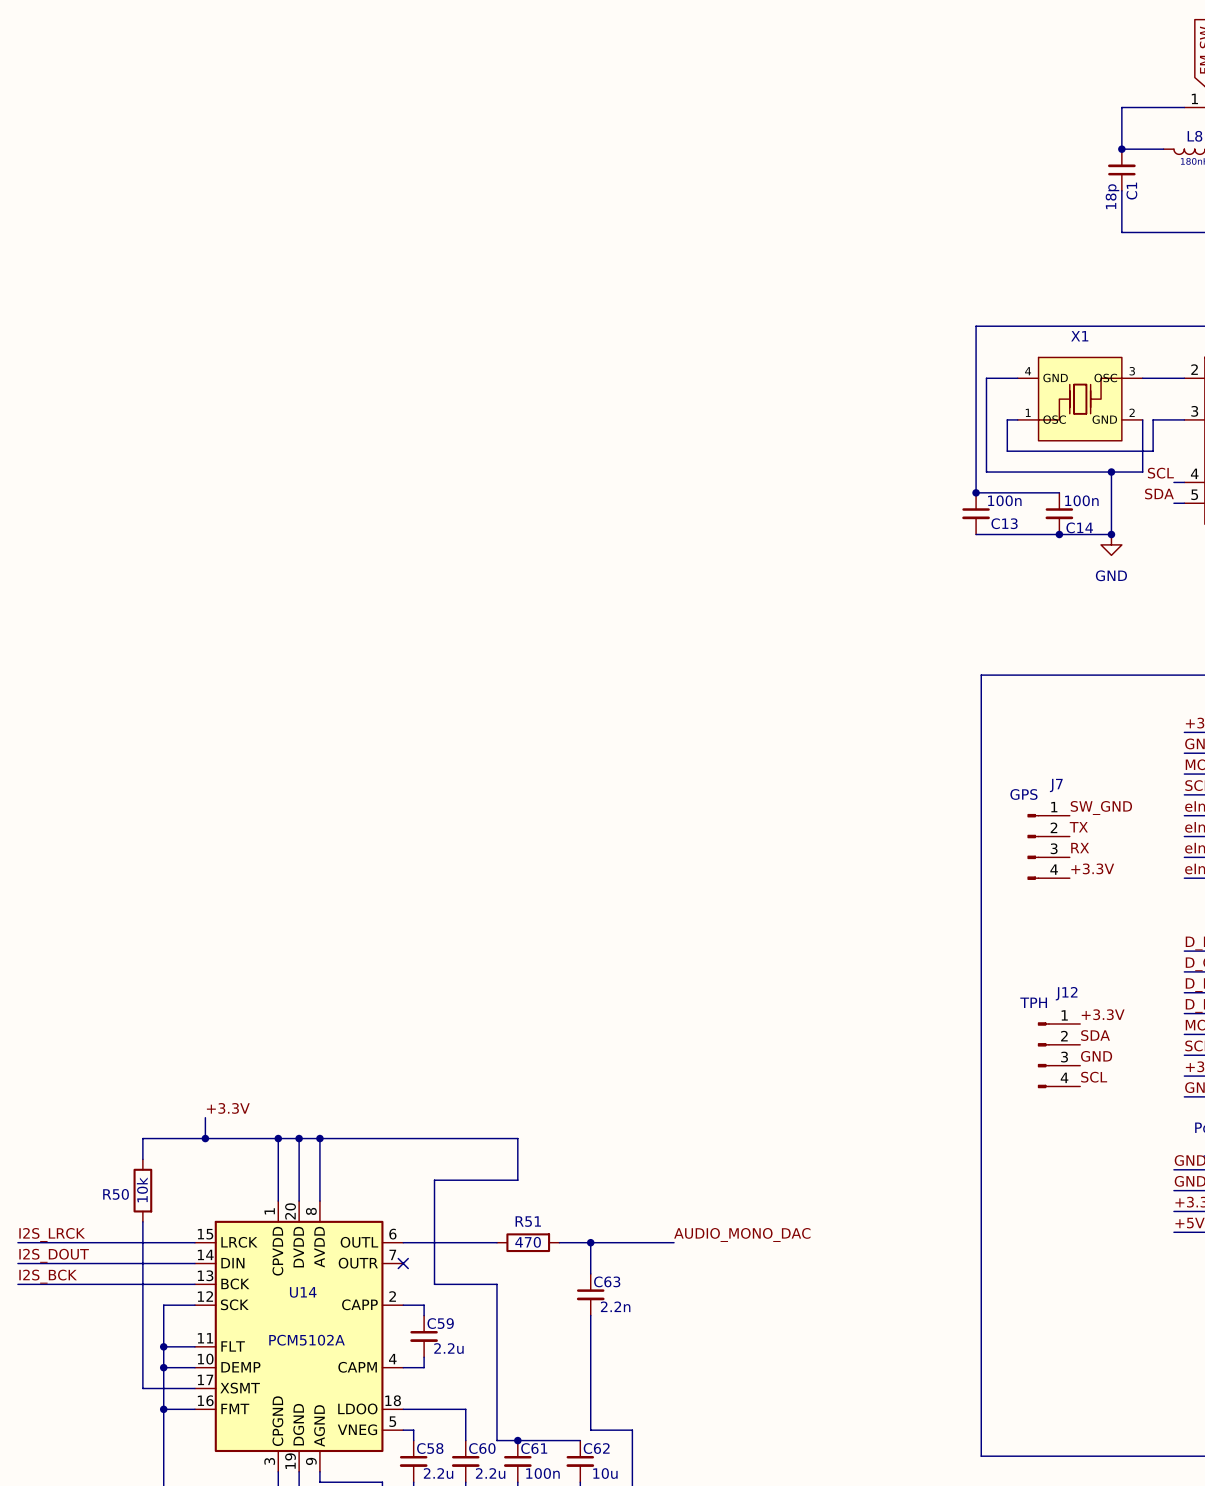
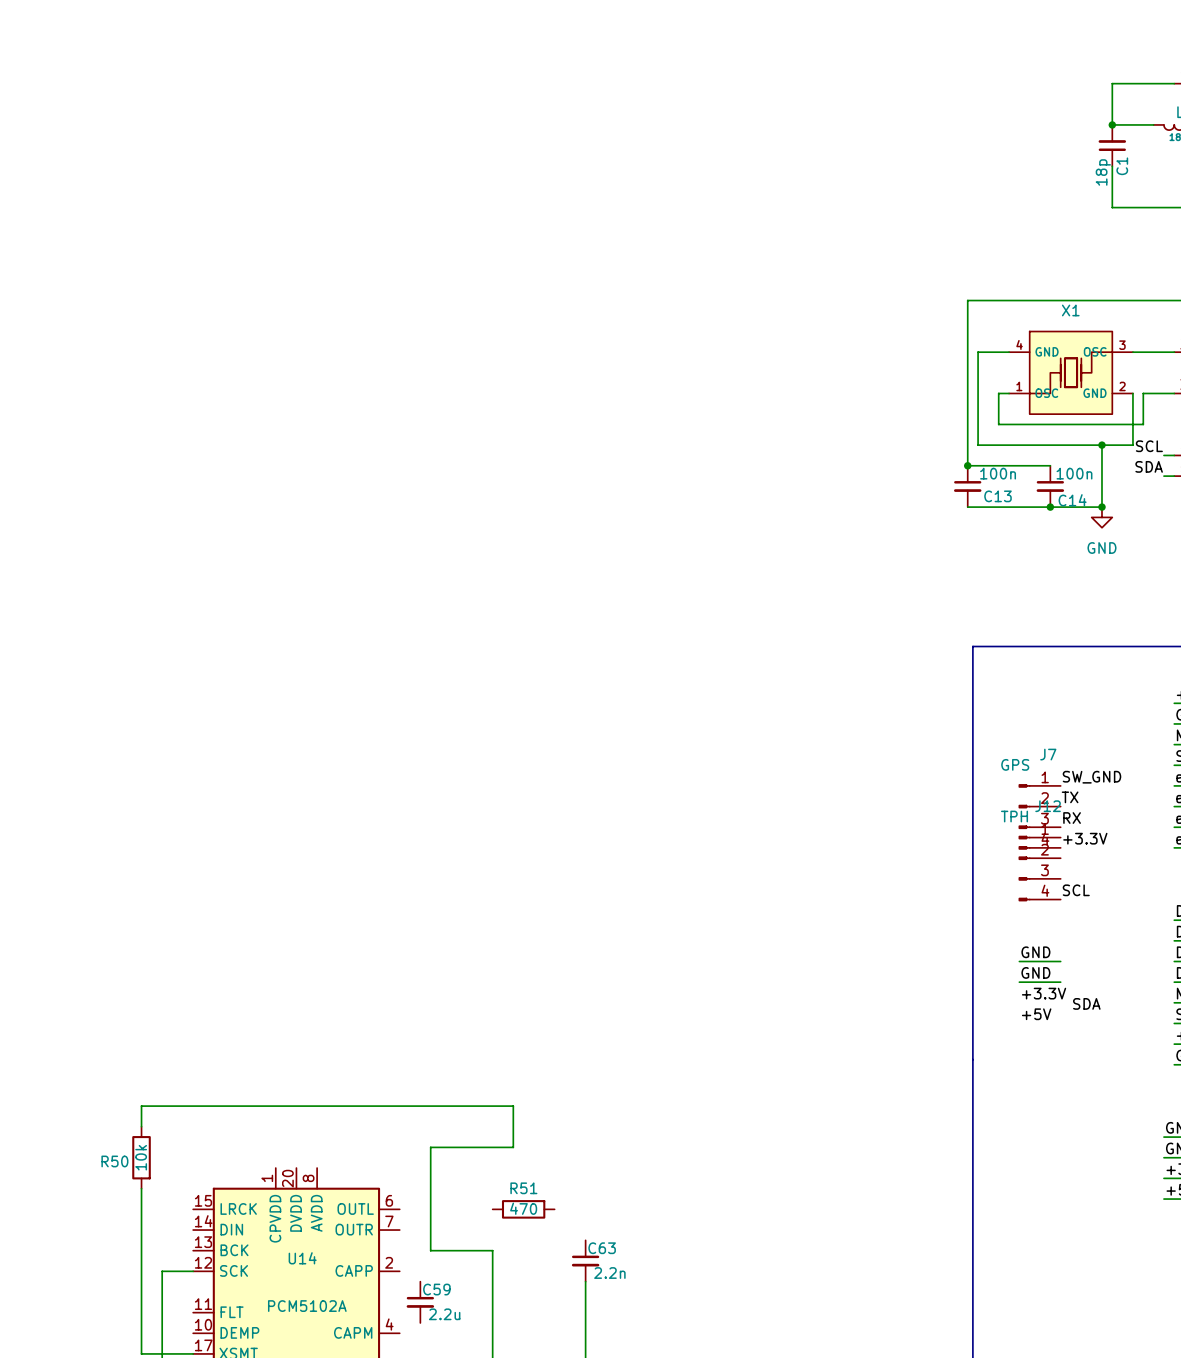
label: none -> GND (1035, 952)
wire: none -> (1019, 961) (1060, 961)
label: none -> GND (1035, 972)
wire: none -> (1019, 982) (1060, 982)
label position: +3.3V (1103, 1014) -> +3.3V (1044, 993)
label: none -> +5V (1036, 1014)
J12 position: (1059, 1055) -> (1039, 868)
label: GND (1096, 1056) -> none
label position: SCL (1094, 1077) -> SCL (1076, 890)
label: +3.3V (228, 1108) -> none
wire: (205, 1117) (205, 1138) -> none
junction: (205, 1138) -> none
wire: (278, 1138) (278, 1201) -> none
junction: (278, 1138) -> none
wire: (299, 1138) (299, 1201) -> none
junction: (299, 1138) -> none
wire: (319, 1138) (319, 1201) -> none
junction: (319, 1138) -> none
label: I2S_LRCK (52, 1234) -> none
label: AUDIO_MONO_DAC (742, 1234) -> none
wire: (17, 1242) (194, 1242) -> none
wire: (403, 1242) (496, 1242) -> none
wire: (559, 1242) (674, 1242) -> none
wire: (590, 1242) (590, 1273) -> none
junction: (590, 1242) -> none
label: I2S_DOUT (54, 1255) -> none
wire: (17, 1263) (194, 1263) -> none
no-connect mark: (403, 1263) -> none
label: I2S_BCK (48, 1276) -> none
wire: (17, 1284) (194, 1284) -> none
wire: (403, 1305) (424, 1305) (424, 1315) -> none
wire: (163, 1346) (194, 1346) -> none
junction: (163, 1346) -> none
wire: (424, 1357) (424, 1367) (403, 1367) -> none
wire: (163, 1367) (194, 1367) -> none
junction: (163, 1367) -> none

